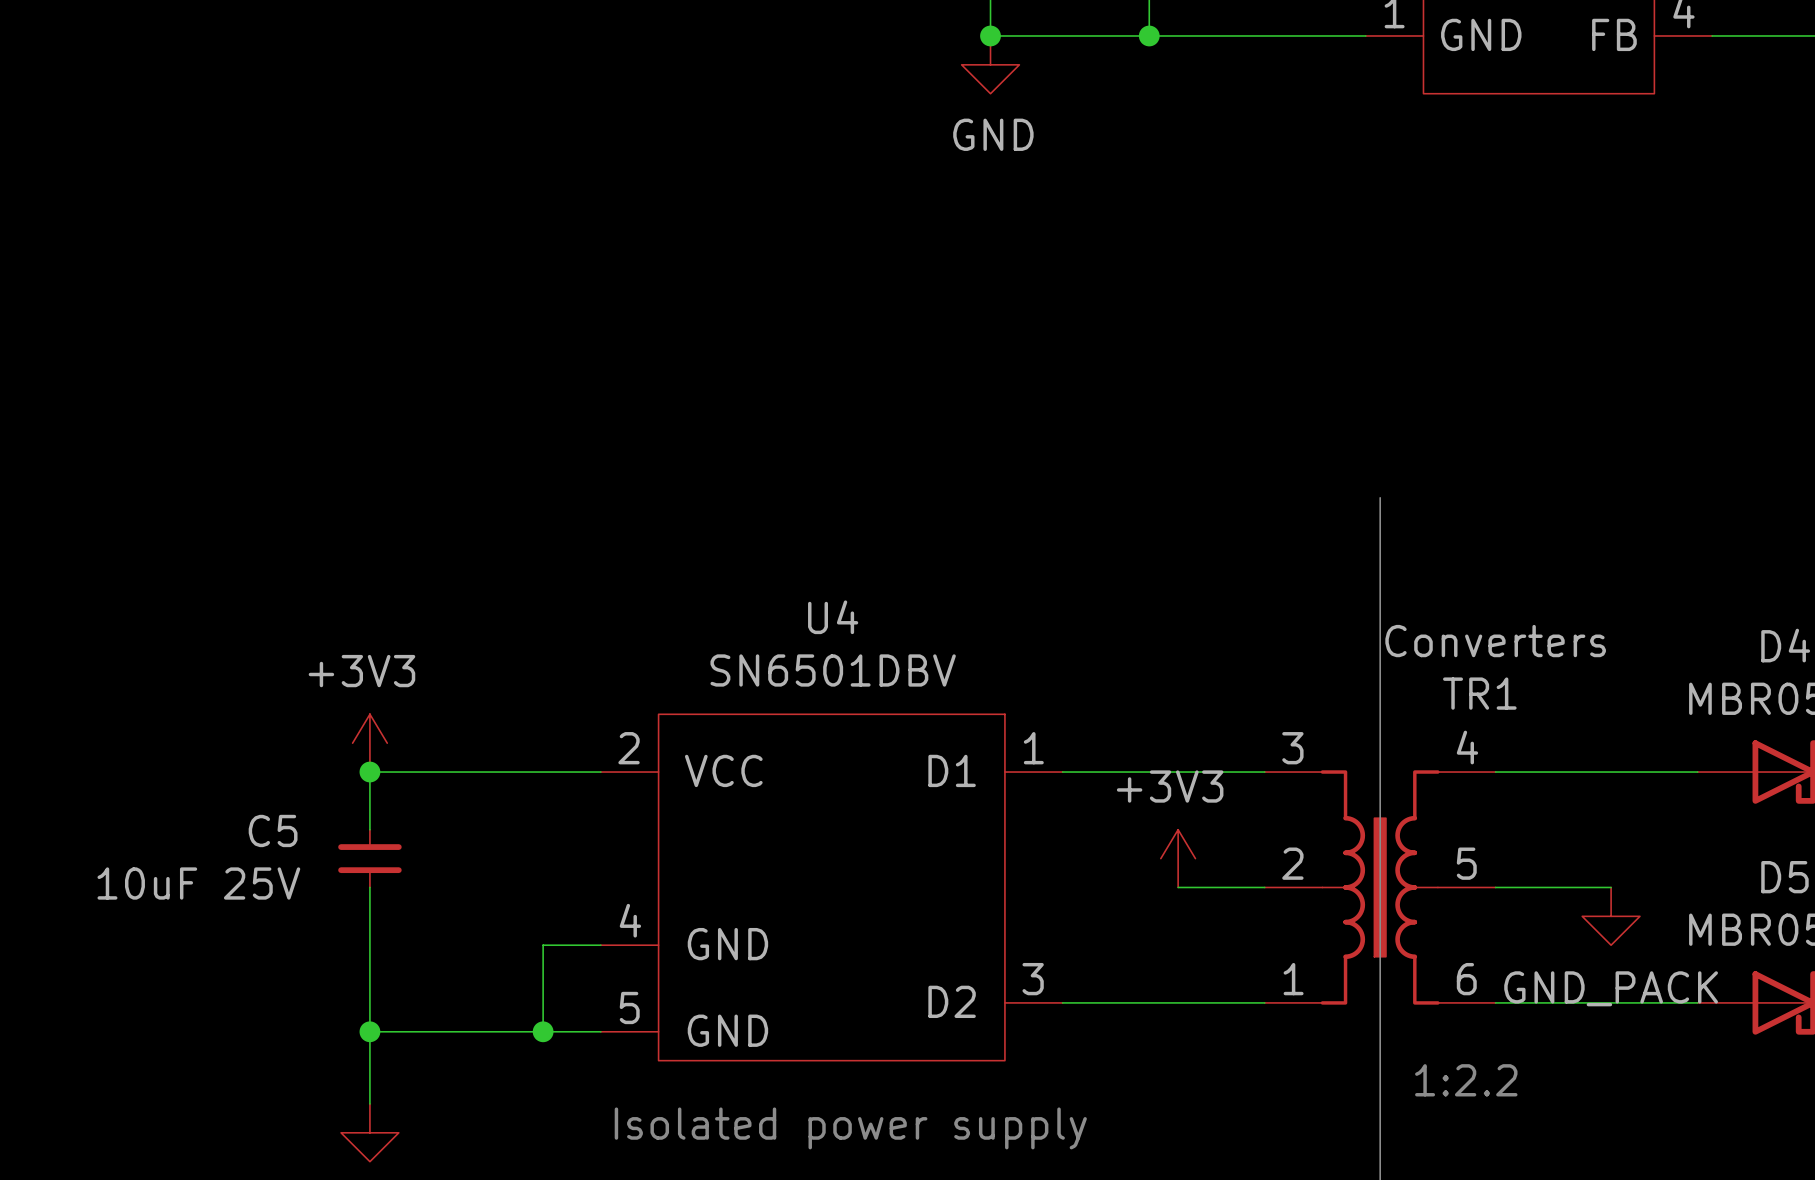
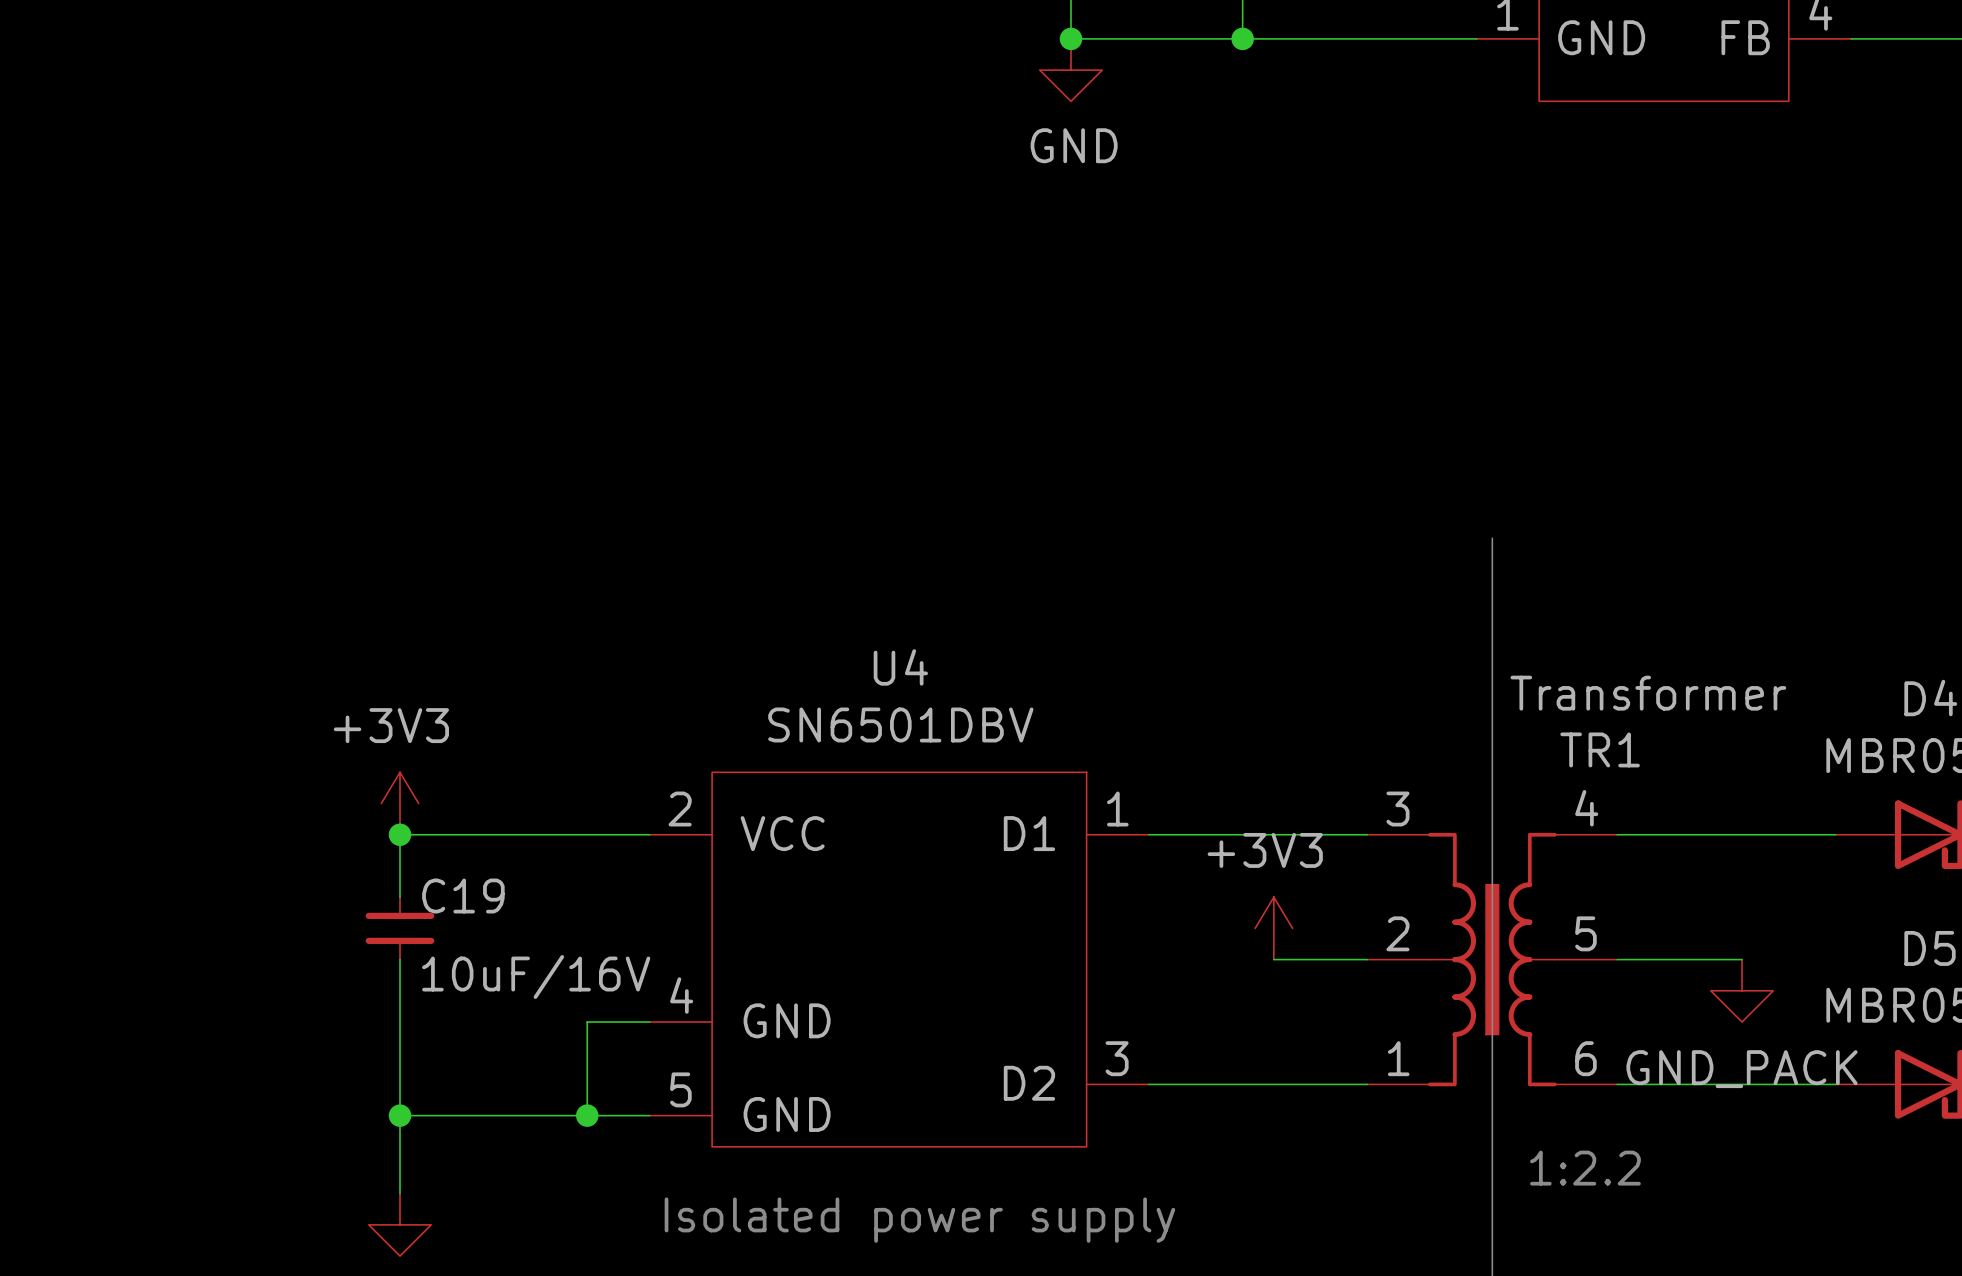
TR1 value: Converters (1495, 641) -> Transformer (1648, 693)
C5 name: C5 (273, 830) -> C19 (463, 896)
C5 value: 10uF 25V (198, 883) -> 10uF/16V (536, 977)

